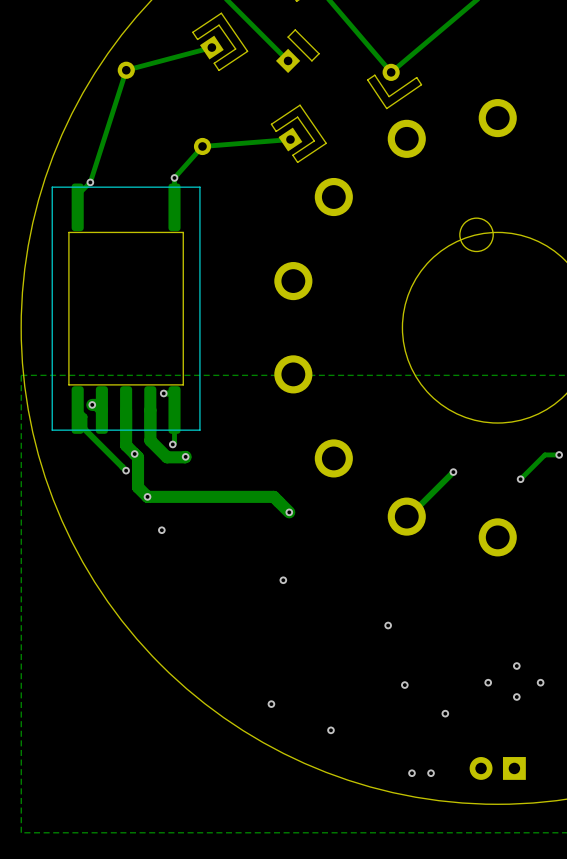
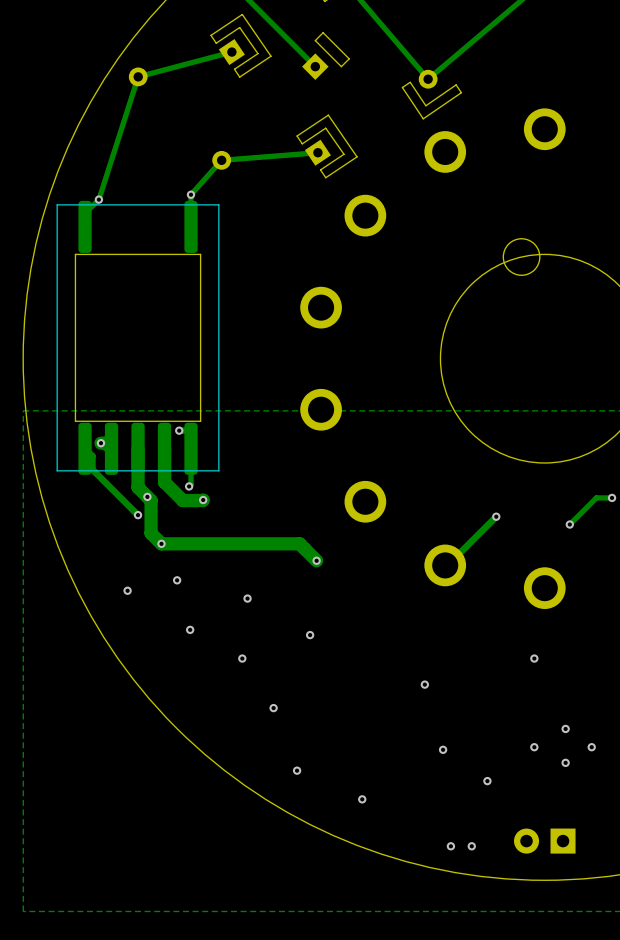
via: none -> (127, 590)
via: none -> (247, 598)
via: none -> (190, 629)
via: none -> (242, 658)
via: none -> (534, 658)
via: none -> (273, 708)

